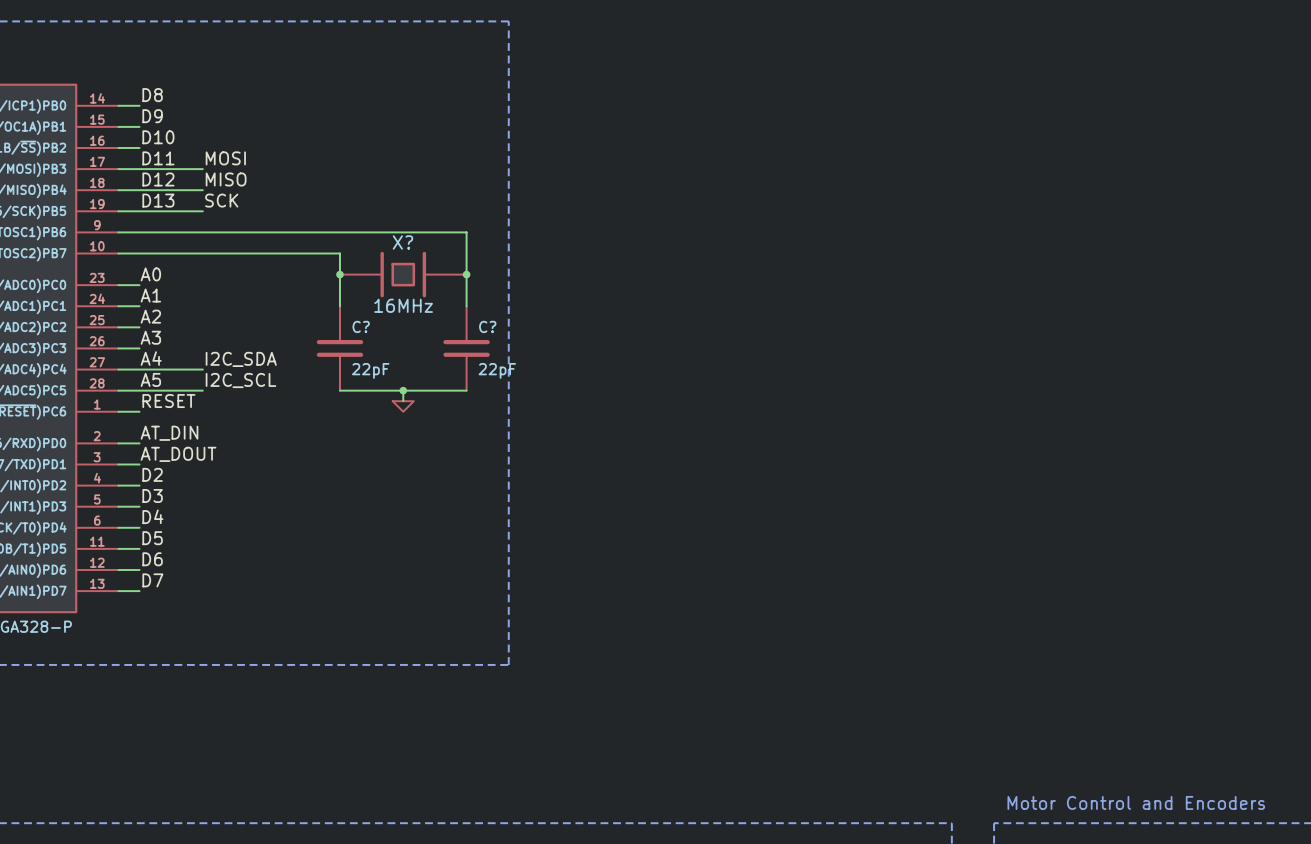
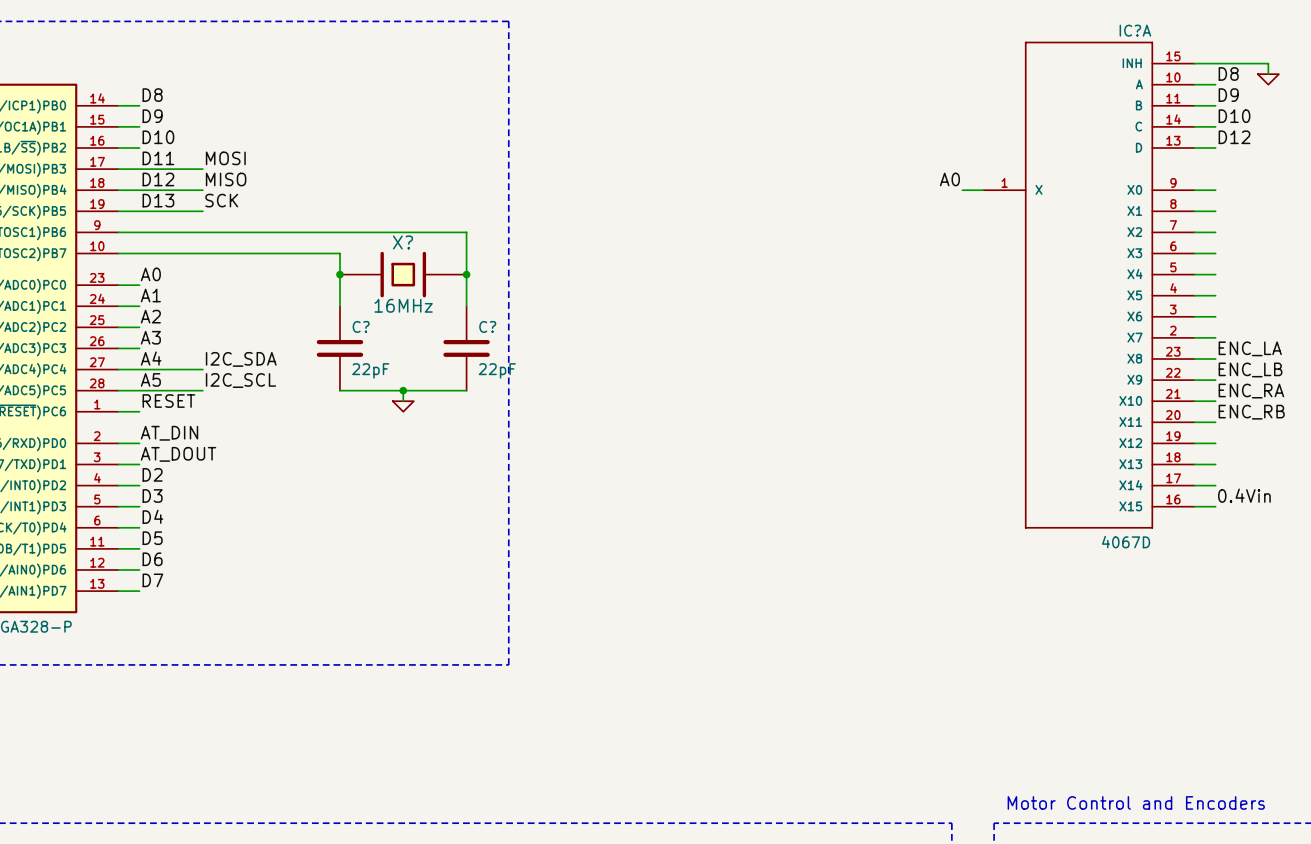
wire: none -> (1194, 63) (1268, 63) (1268, 74)
label: none -> D8 (1228, 73)
power symbol: none -> (1268, 79)
wire: none -> (1194, 84) (1215, 84)
label: none -> D9 (1228, 95)
wire: none -> (1194, 105) (1215, 105)
label: none -> D10 (1234, 116)
wire: none -> (1194, 126) (1215, 126)
label: none -> D12 (1234, 137)
wire: none -> (1194, 148) (1215, 148)
label: none -> A0 (949, 179)
wire: none -> (962, 190) (983, 190)
wire: none -> (1194, 190) (1215, 190)
wire: none -> (1194, 211) (1215, 211)
wire: none -> (1194, 232) (1215, 232)
wire: none -> (1194, 253) (1215, 253)
wire: none -> (1194, 274) (1215, 274)
IC?A: none -> 4067D (1089, 285)
wire: none -> (1194, 295) (1215, 295)
wire: none -> (1194, 316) (1215, 316)
wire: none -> (1194, 337) (1215, 337)
label: none -> ENC_LA (1250, 348)
wire: none -> (1194, 359) (1215, 359)
label: none -> ENC_LB (1250, 369)
wire: none -> (1194, 380) (1215, 380)
label: none -> ENC_RA (1251, 391)
wire: none -> (1194, 401) (1215, 401)
label: none -> ENC_RB (1251, 412)
wire: none -> (1194, 422) (1215, 422)
wire: none -> (1194, 443) (1215, 443)
wire: none -> (1194, 464) (1215, 464)
wire: none -> (1194, 485) (1215, 485)
label: none -> 0.4Vin (1244, 495)
wire: none -> (1194, 506) (1215, 506)

